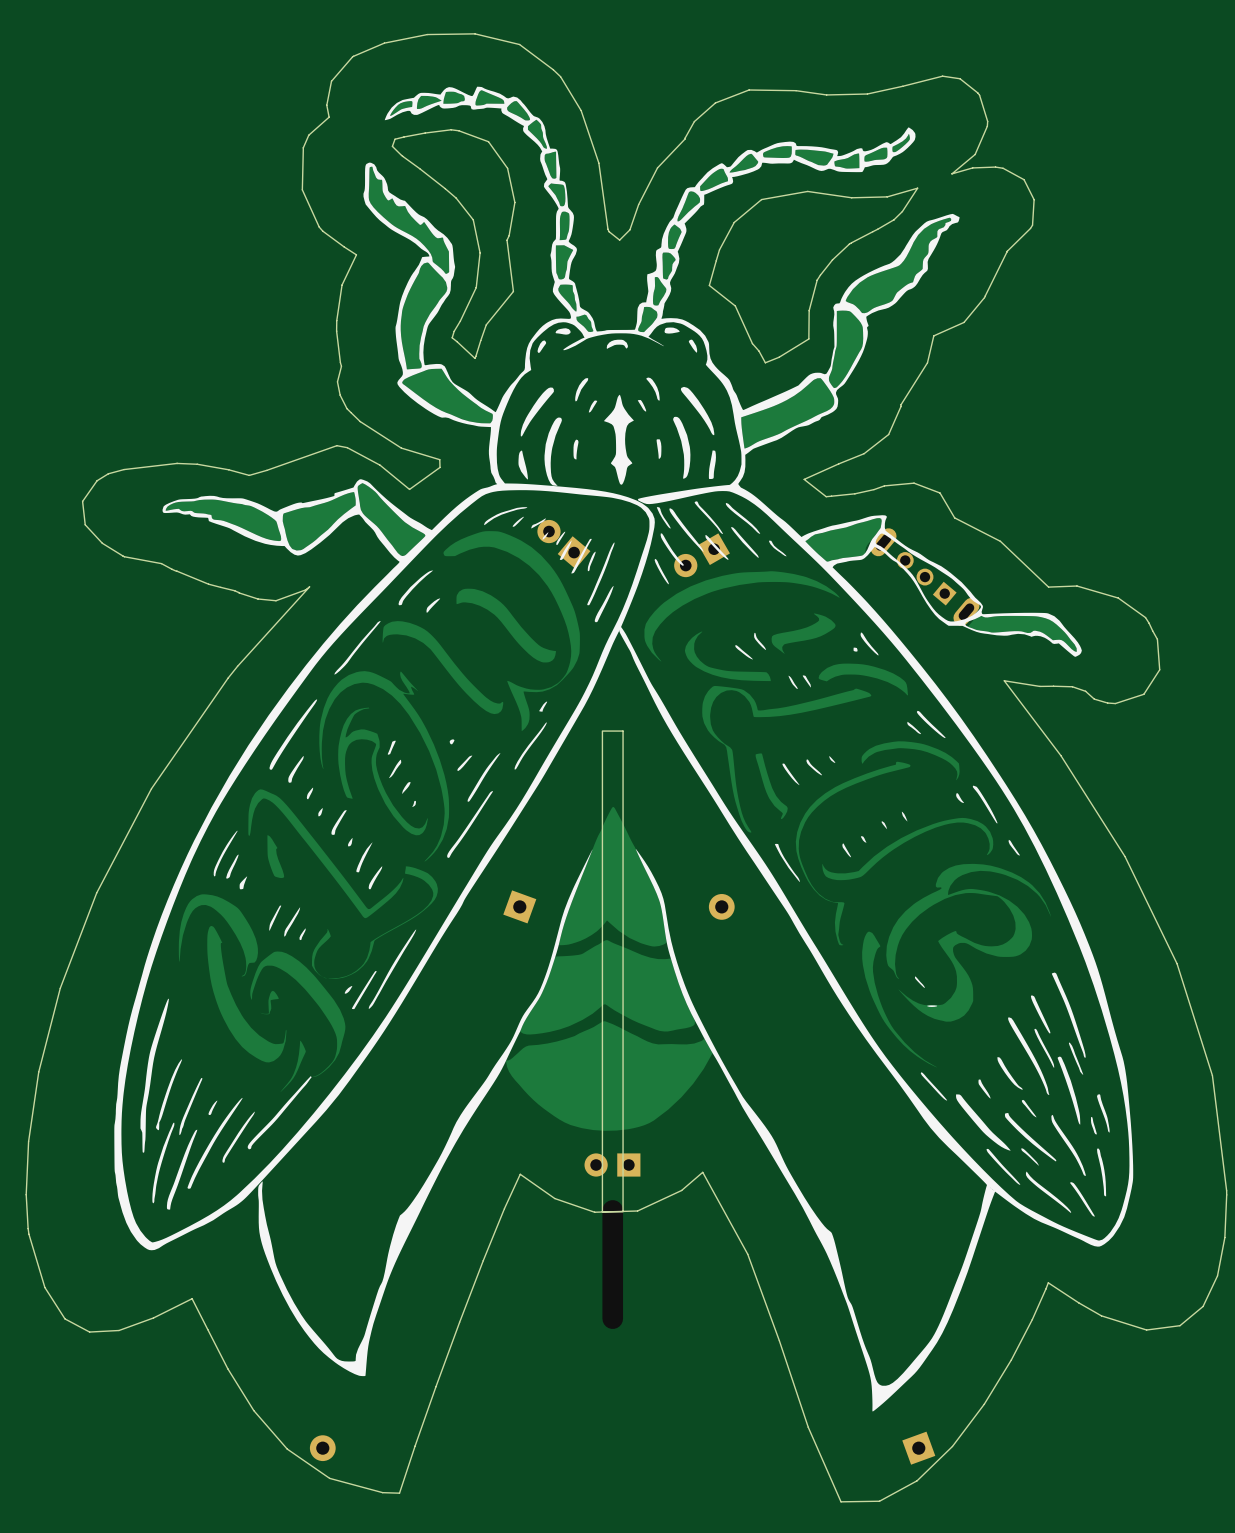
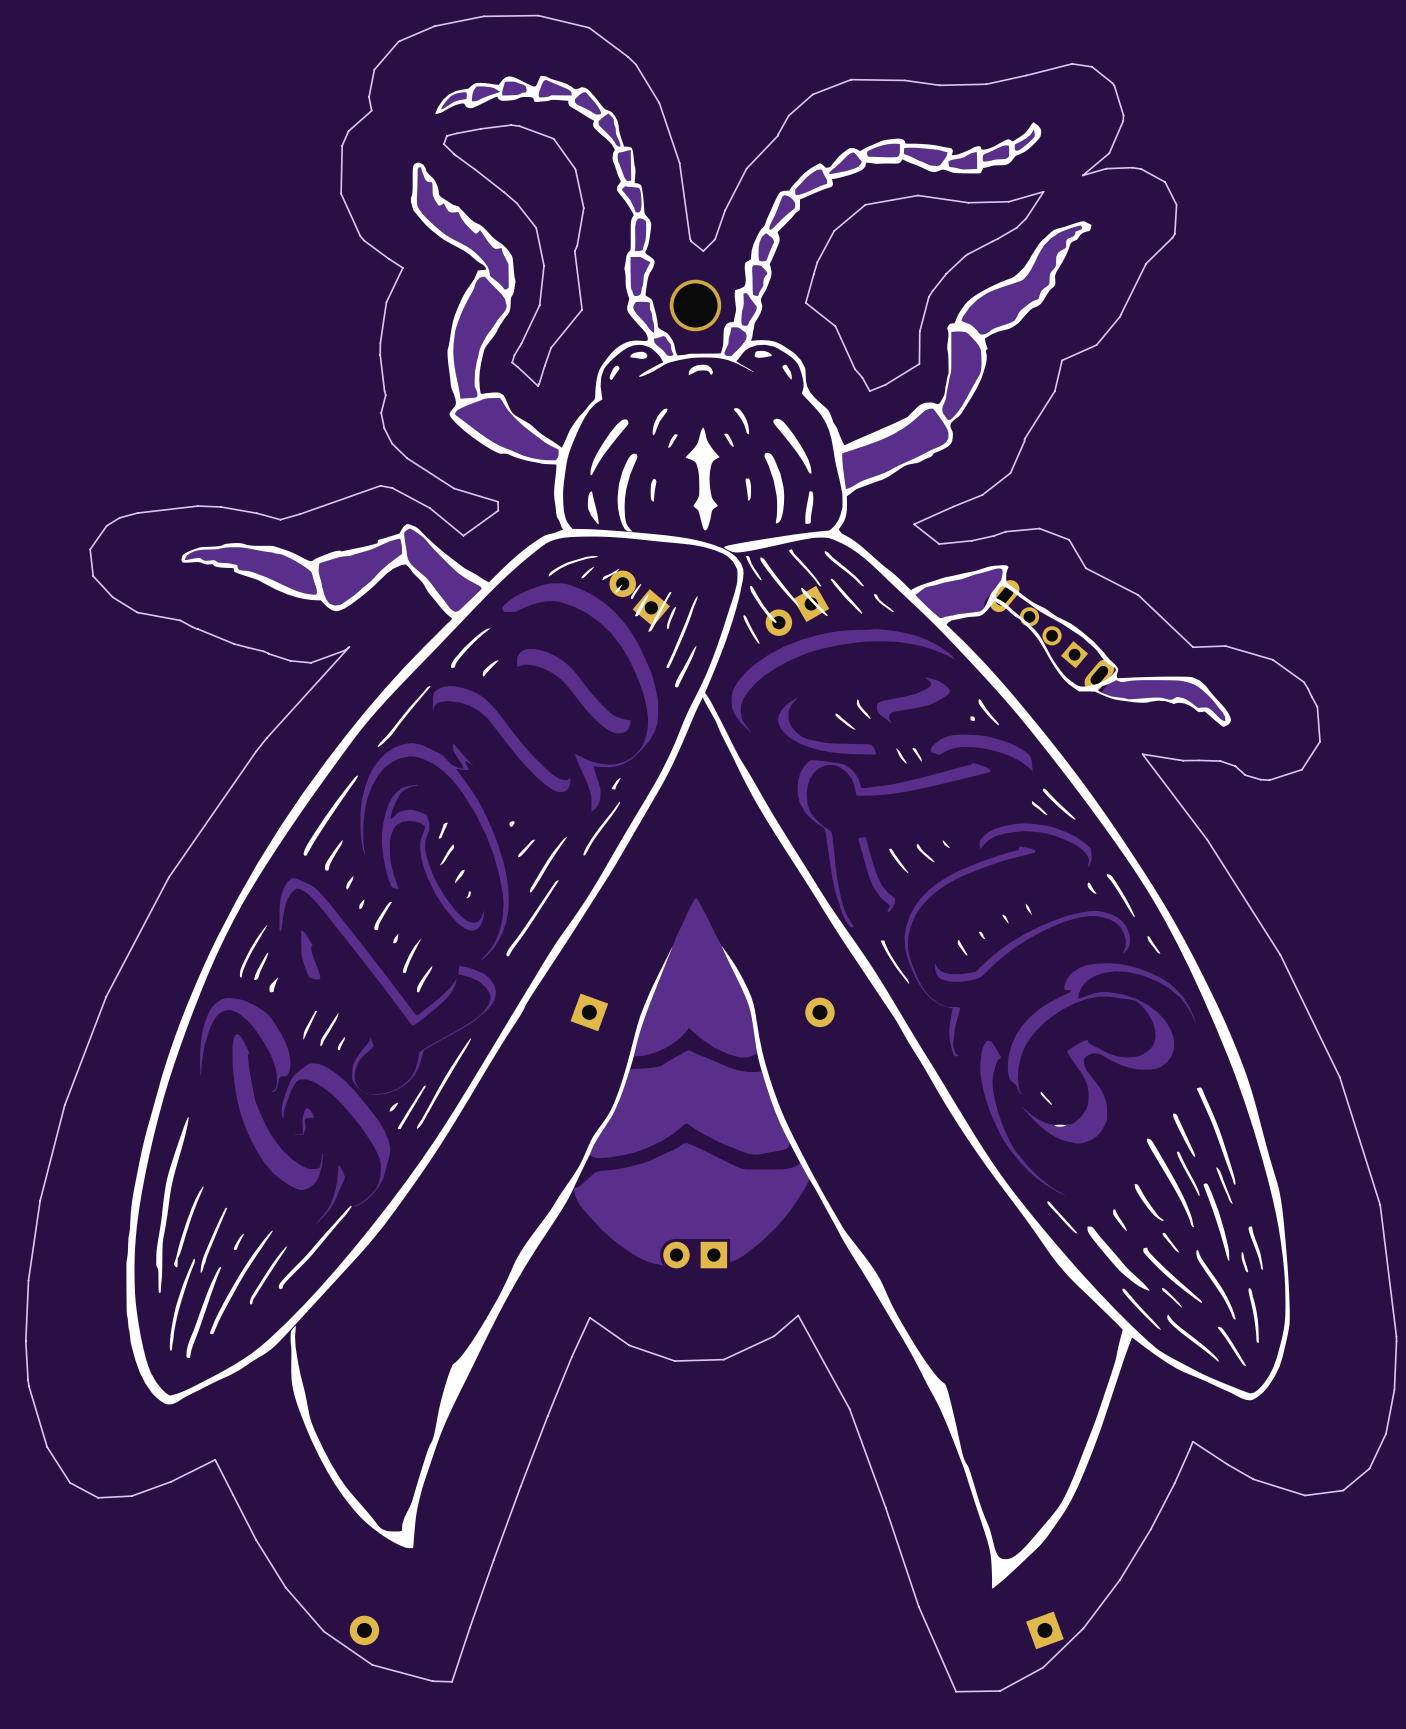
drawing shape: [165, 90, 1077, 1131] -> [185, 79, 1226, 1266]
via: none -> (695, 305)
part: (612, 1029) -> none
part position: (612, 1165) -> (695, 1255)

